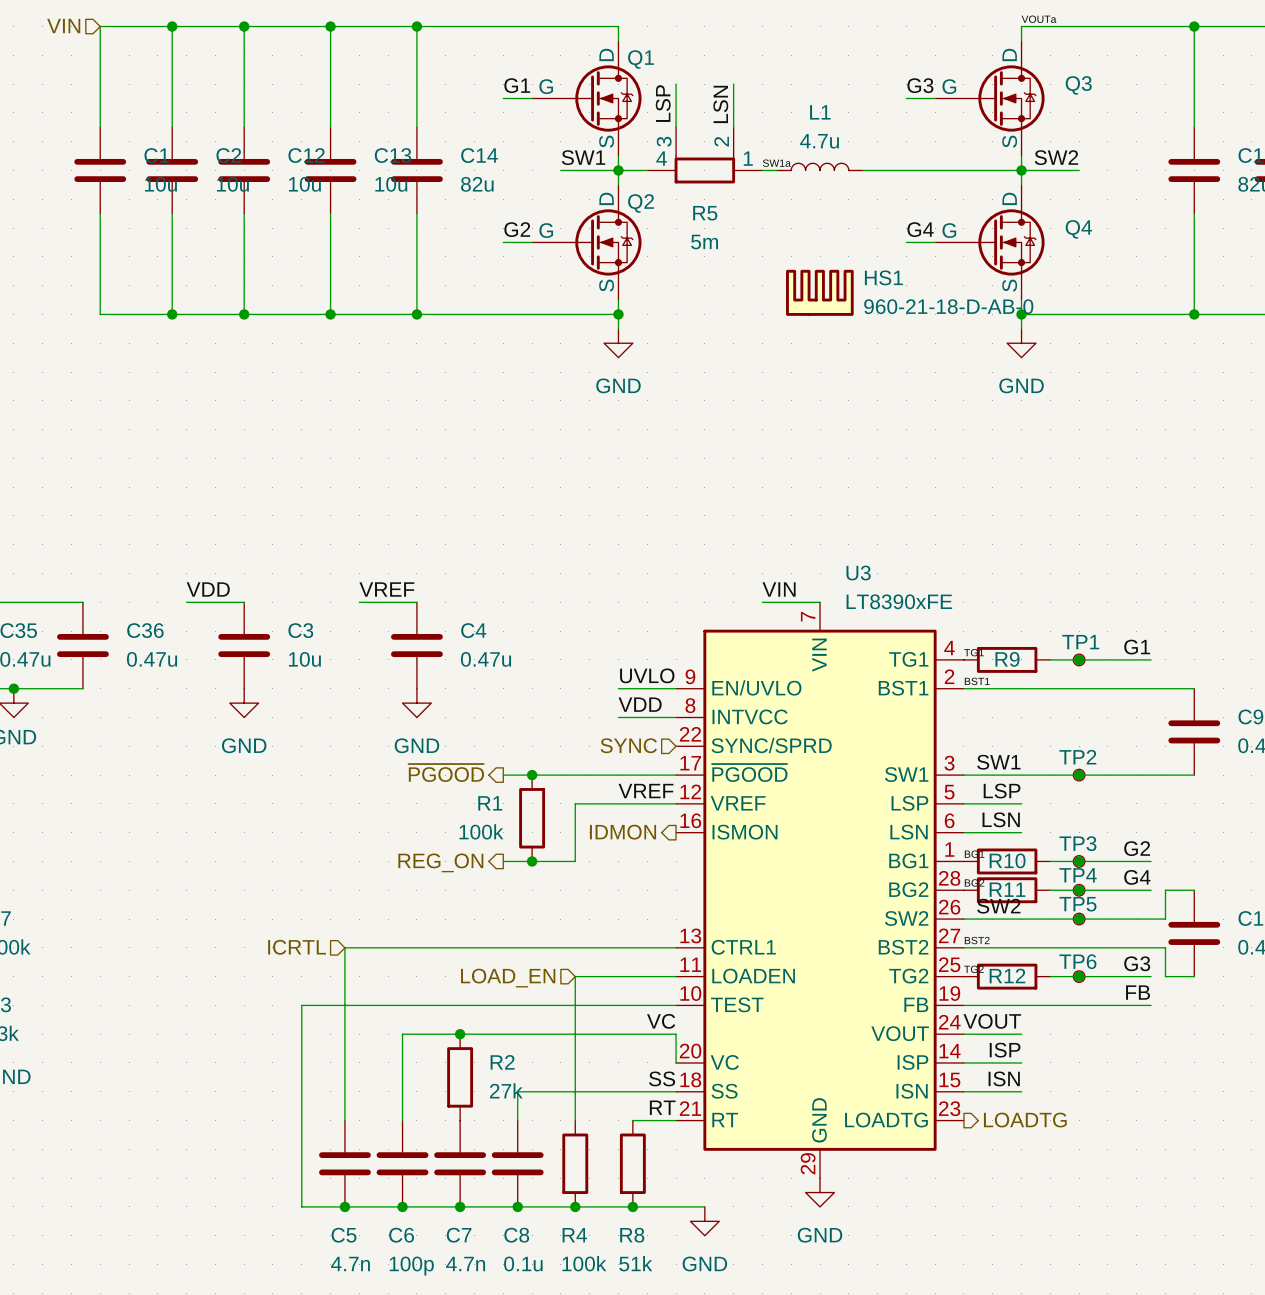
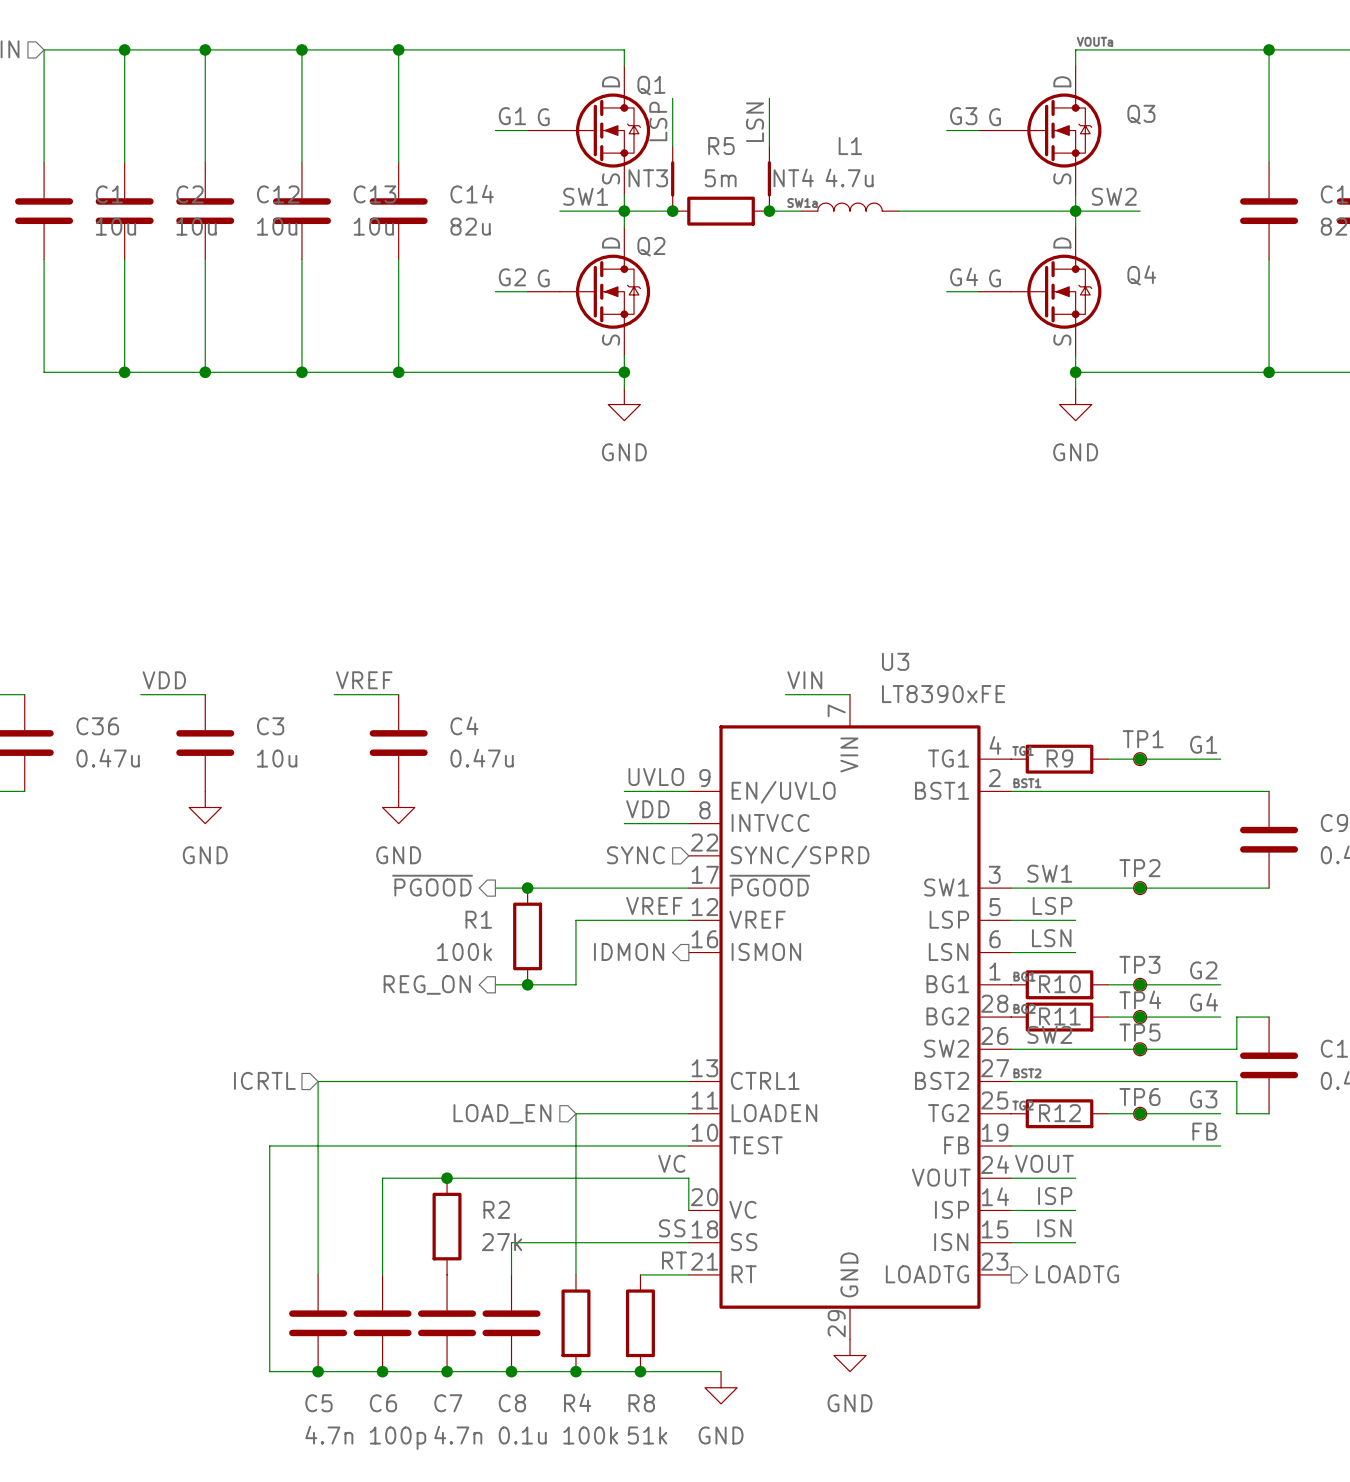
wire: (676, 84) (676, 127) -> (672, 98) (672, 146)
wire: (733, 84) (733, 127) -> (769, 98) (769, 146)
label position: LSP (663, 103) -> LSP (658, 121)
label position: LSN (720, 104) -> LSN (755, 122)
R5 symbol: [647, 127, 763, 184] -> [672, 196, 770, 226]
NT3: none -> (672, 178)
NT4: none -> (769, 178)
junction: none -> (672, 211)
junction: none -> (769, 211)
R5 name position: R5 (705, 213) -> R5 (721, 146)
R5 value position: 5m (704, 242) -> 5m (720, 178)
HS1: 960-21-18-D-AB-0 (819, 292) -> none

